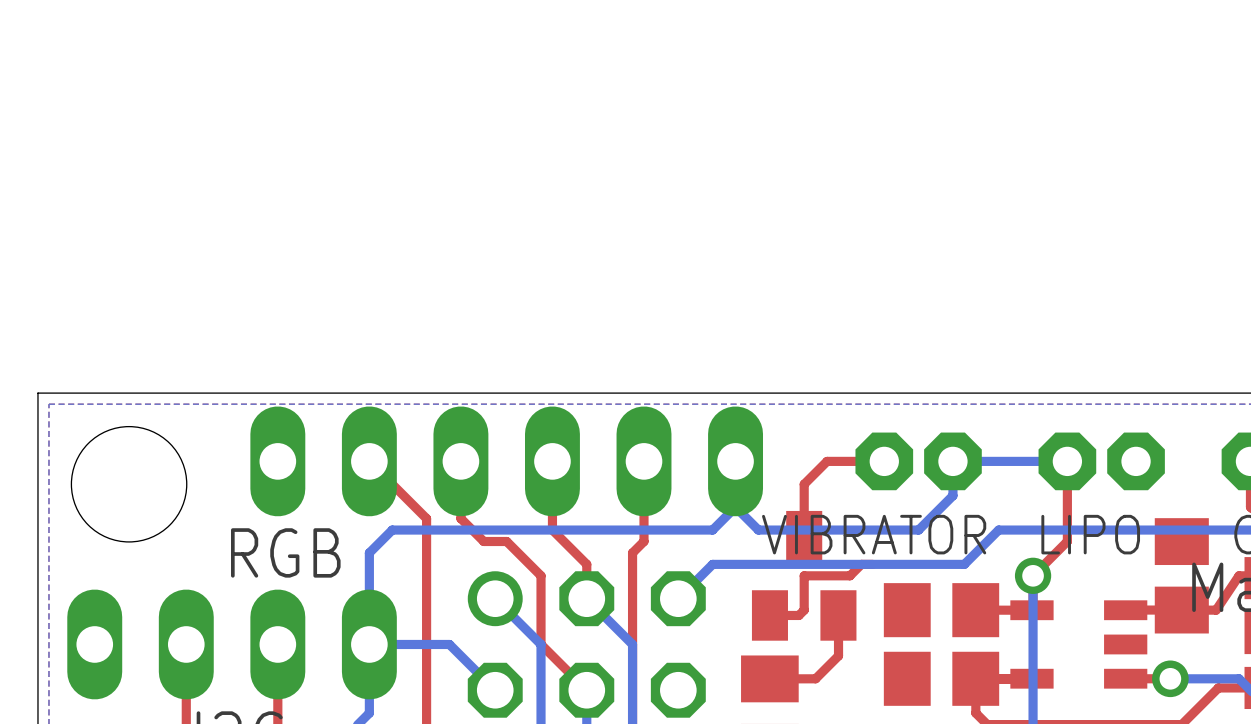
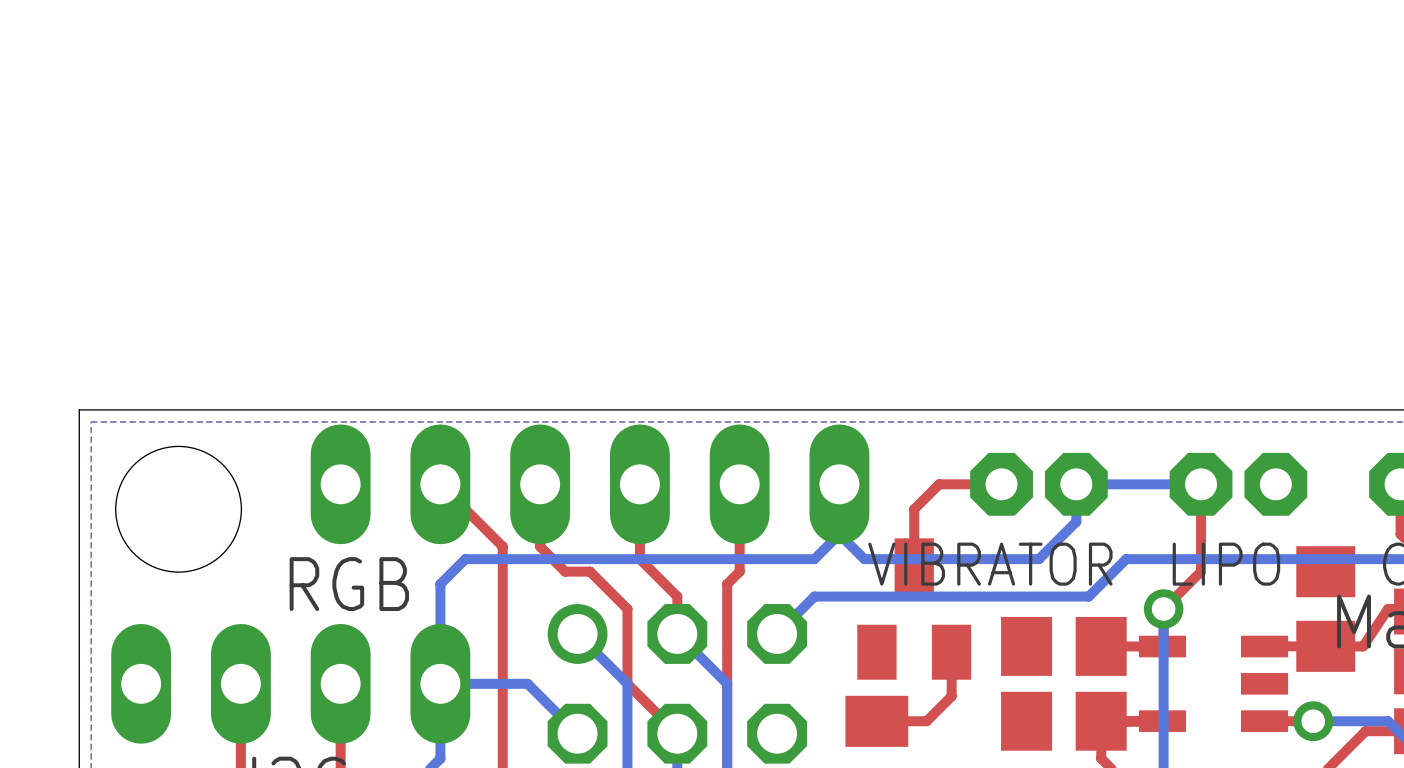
top track: (872, 564) (861, 564) (849, 575) (804, 575) (804, 610) (798, 615) (769, 615) -> none

